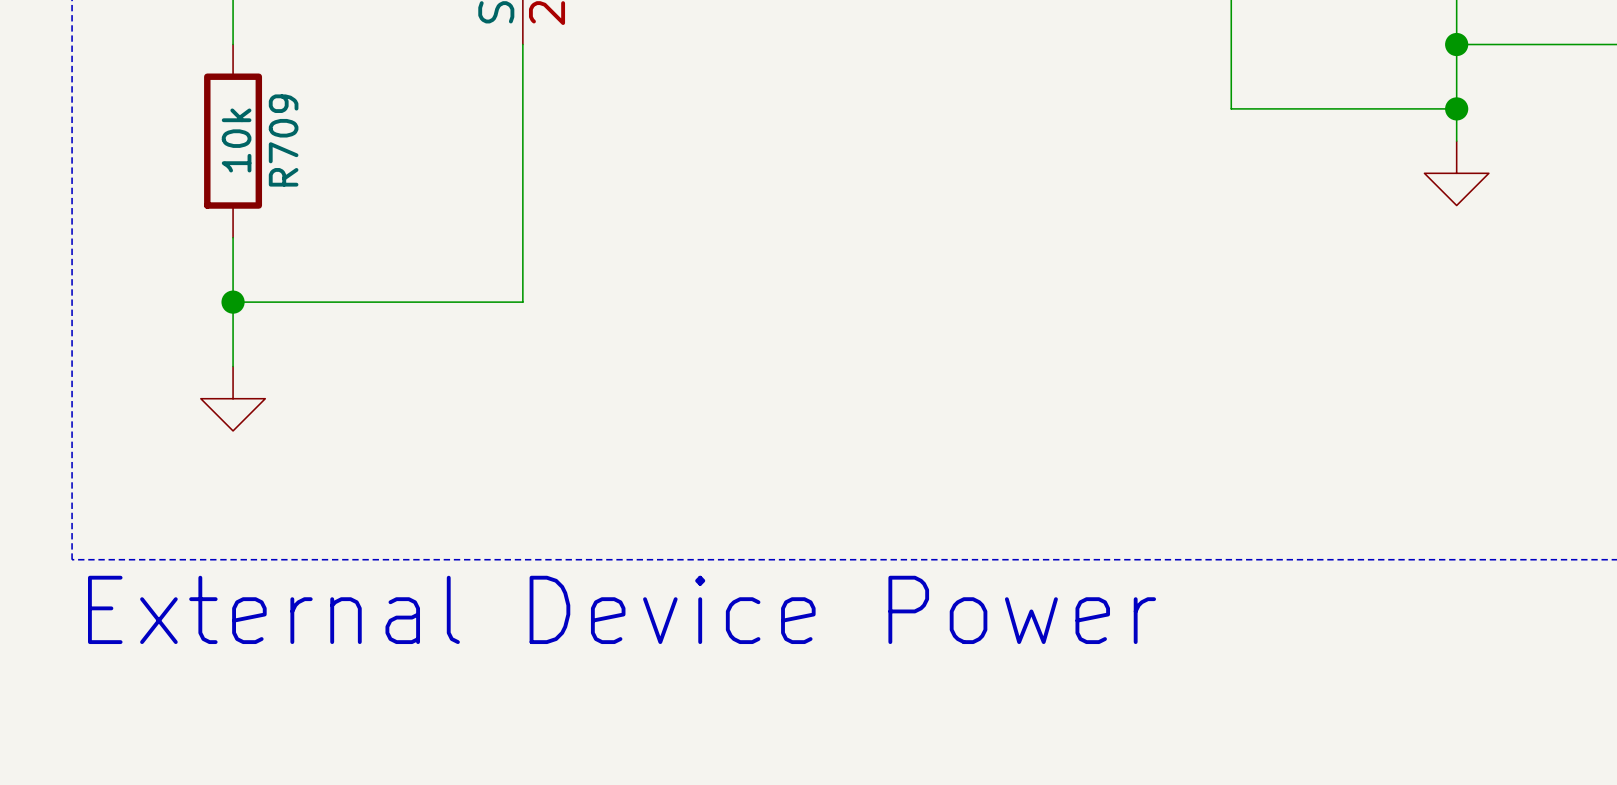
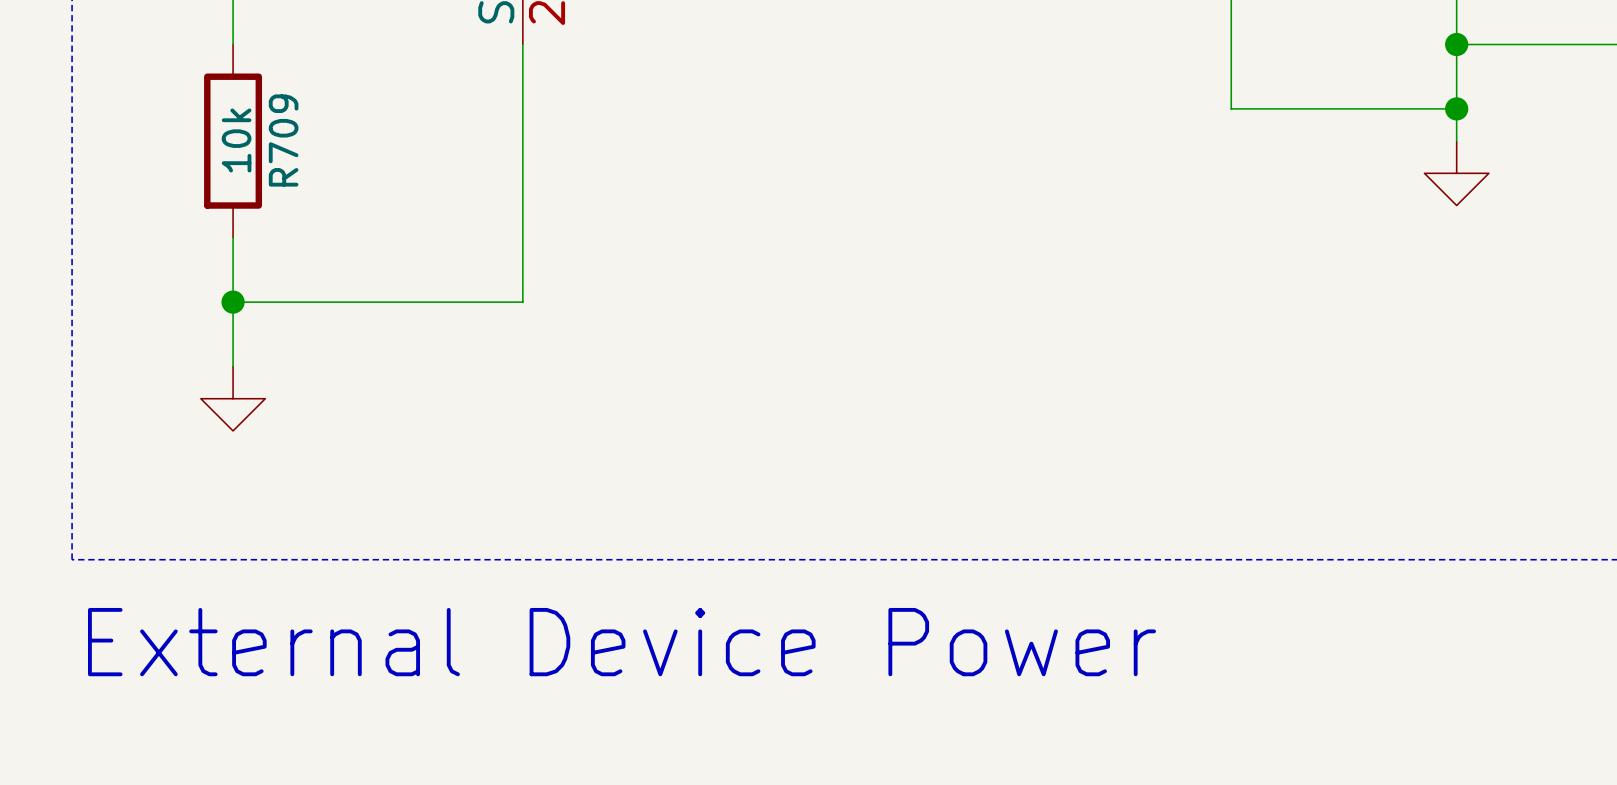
text position: External Device Power (622, 609) -> External Device Power (622, 642)

